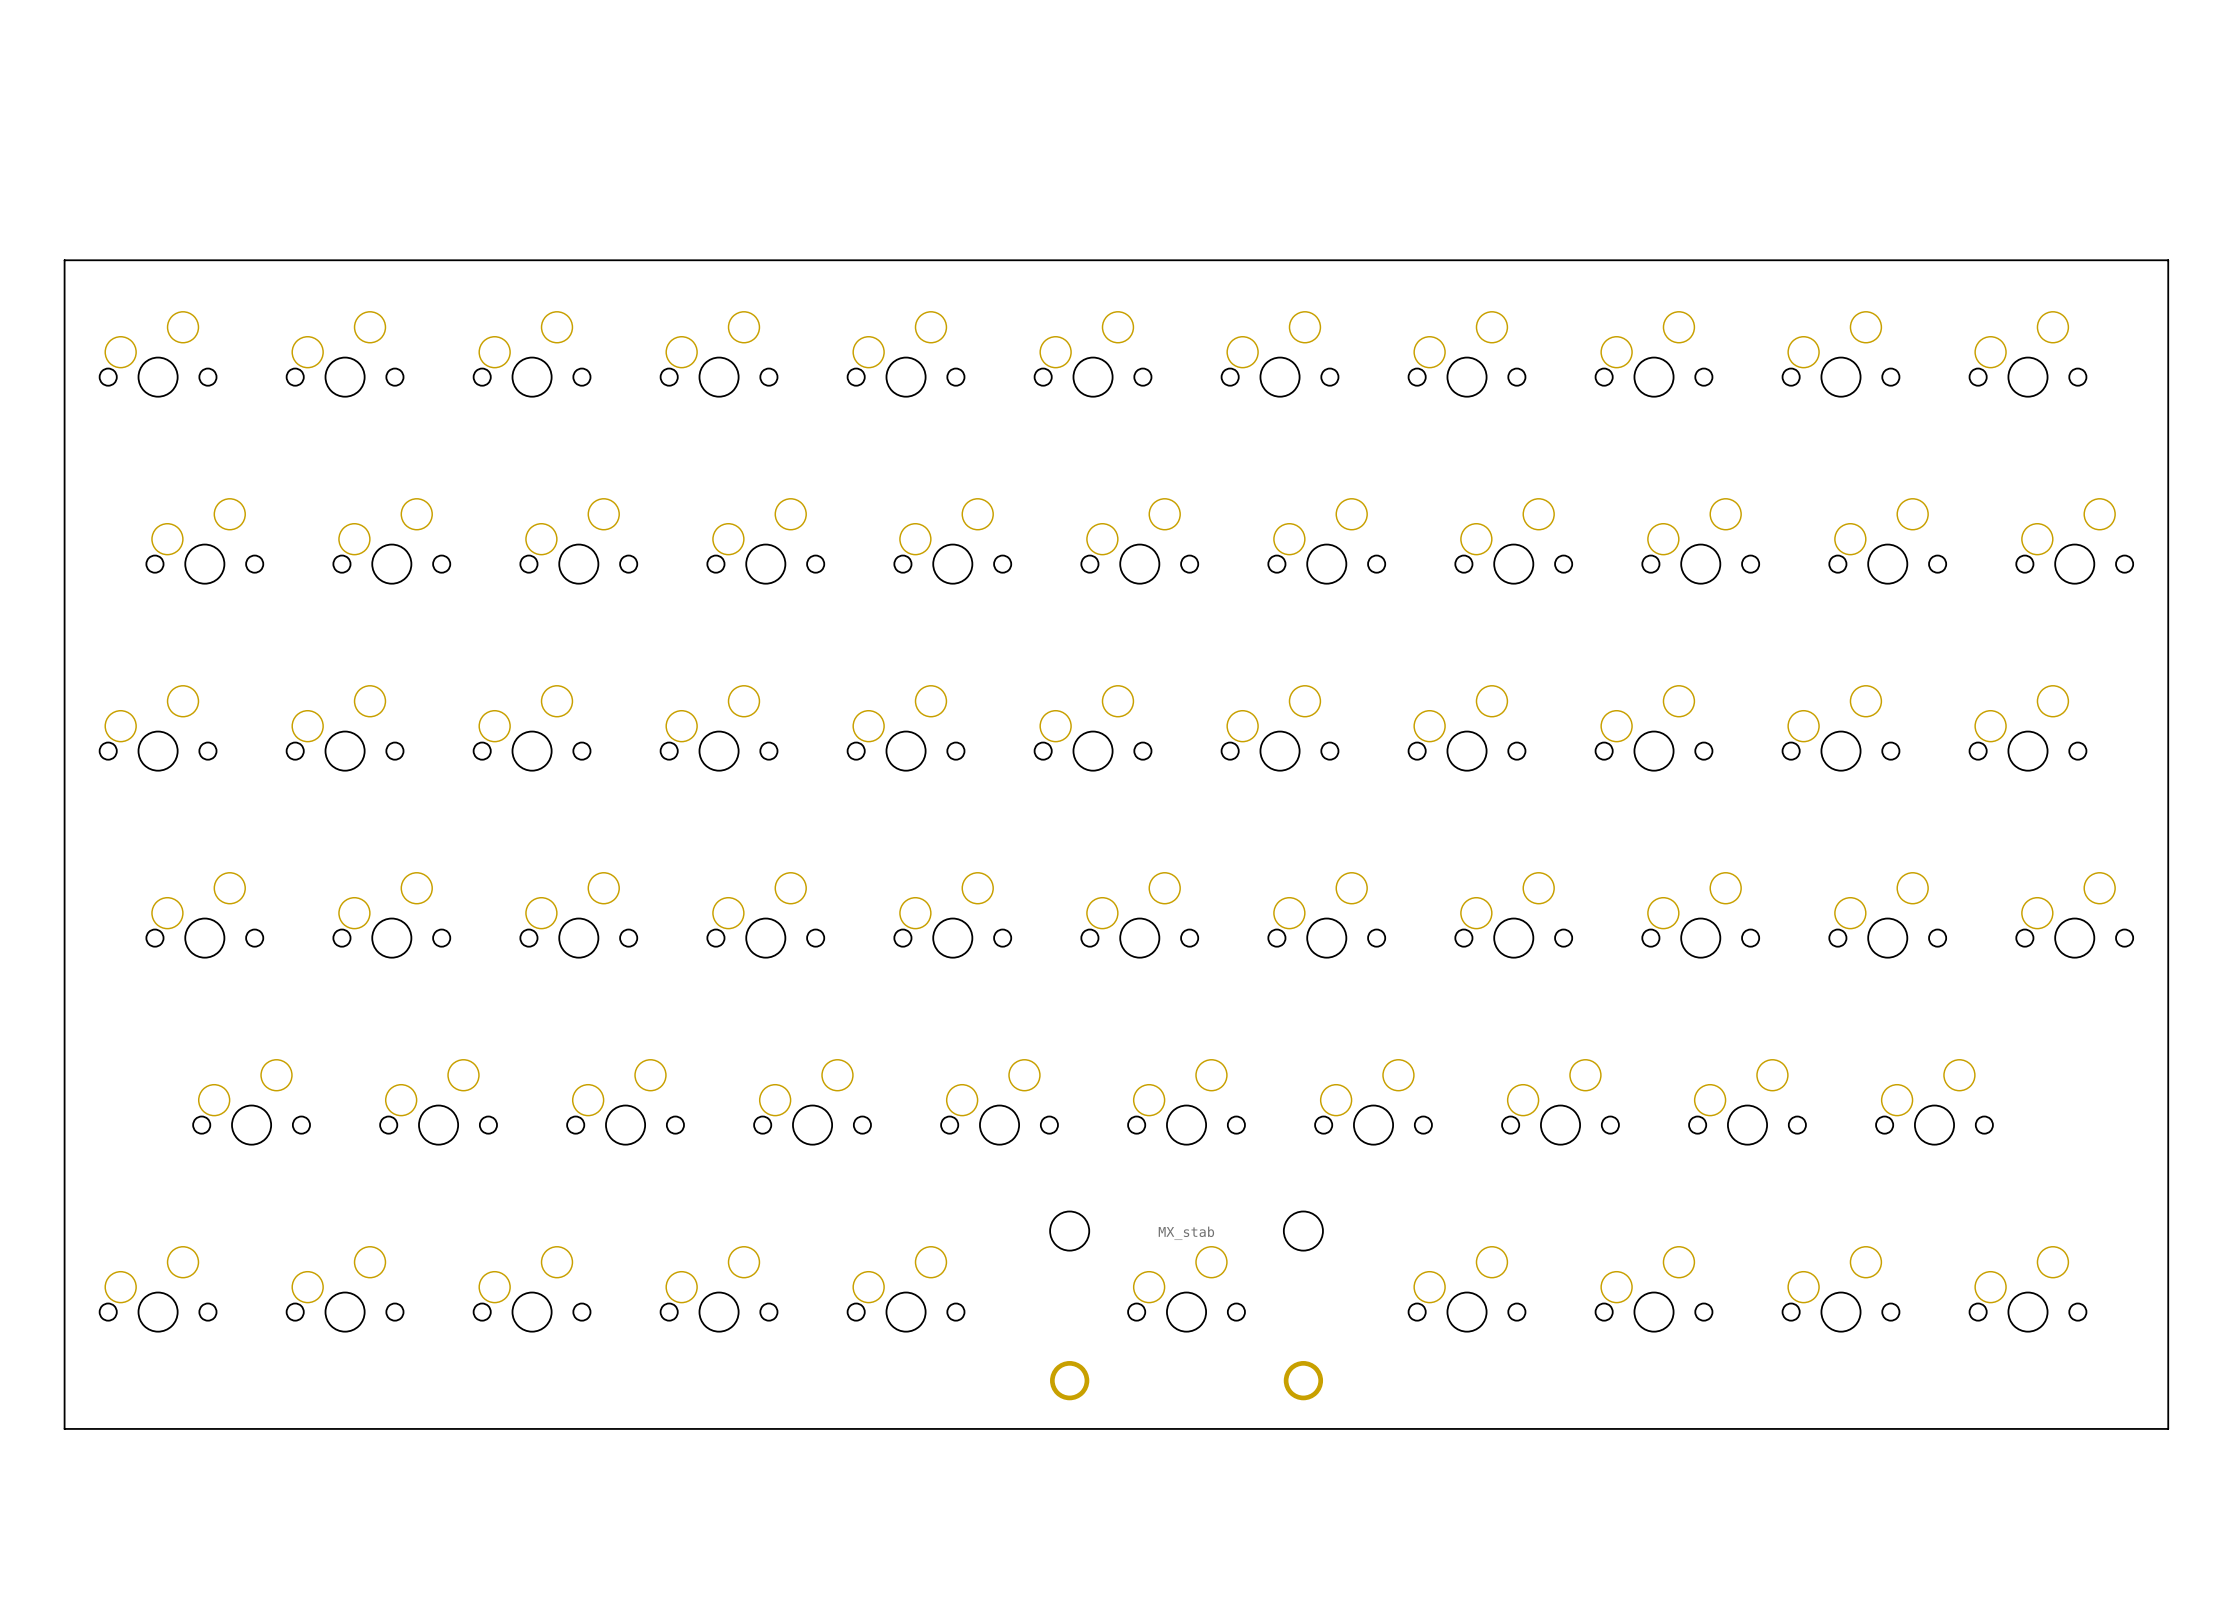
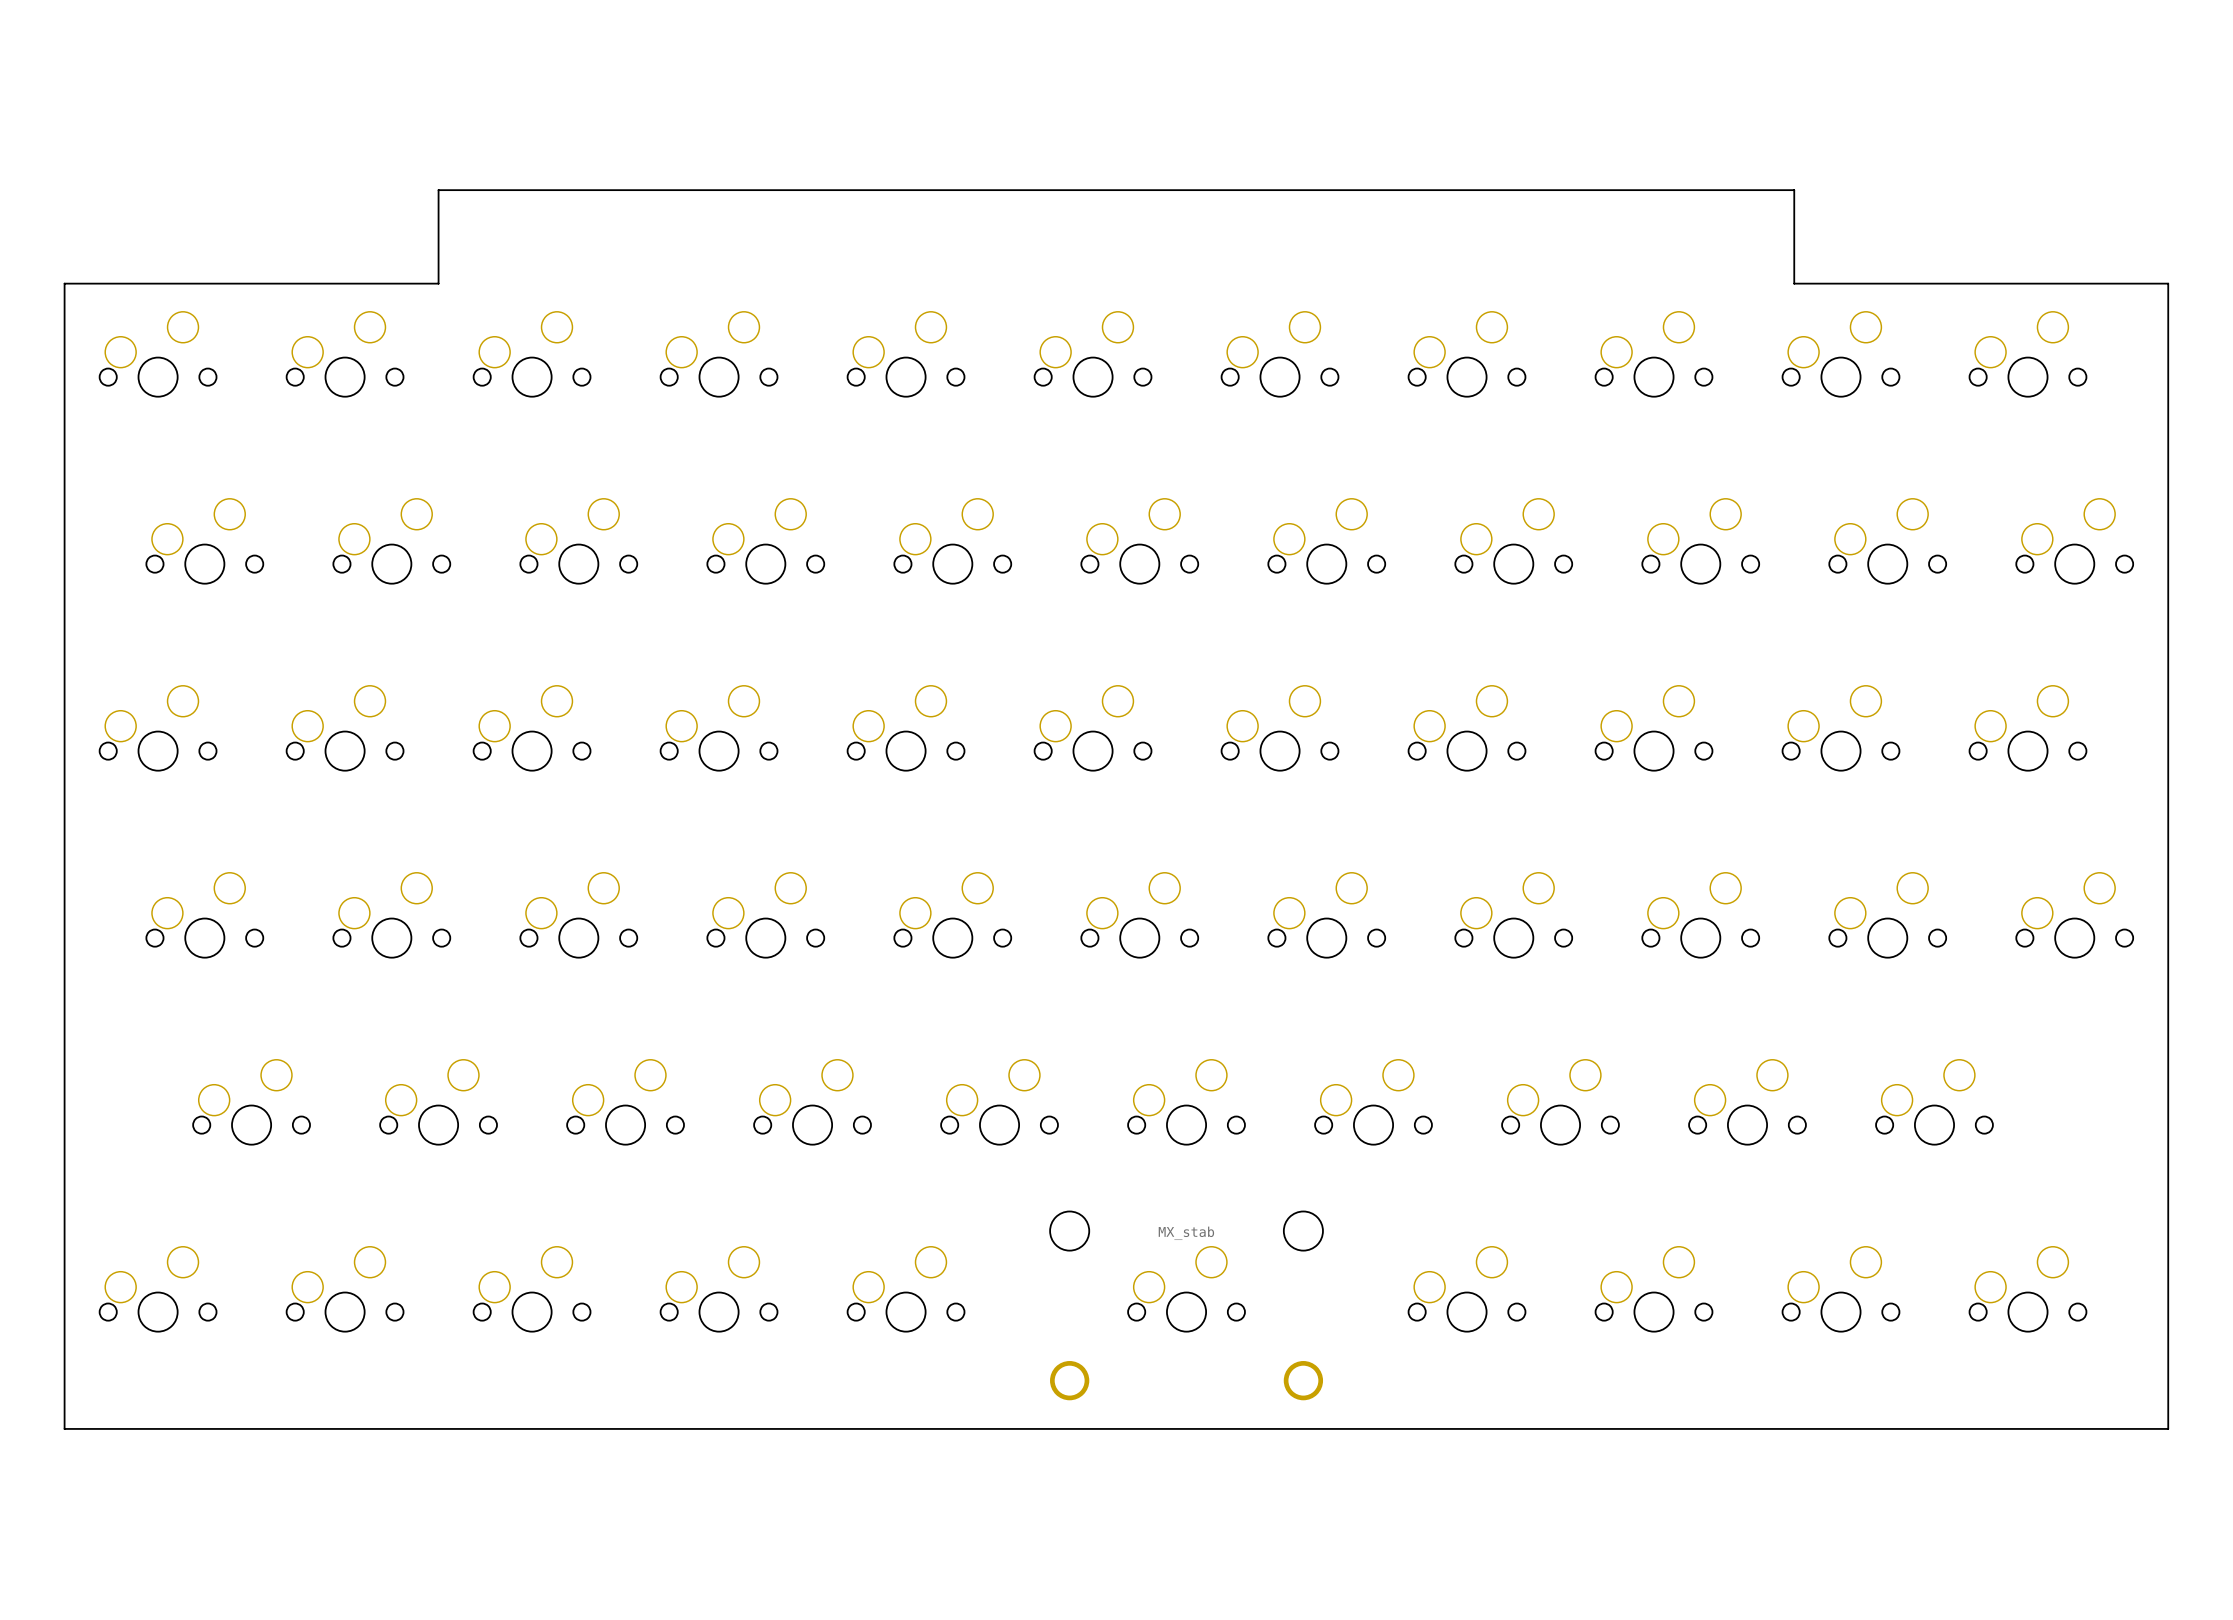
board edge: (64, 283) (64, 260) (2168, 260) (2168, 283) -> (64, 283) (438, 283) (438, 190) (1794, 190) (1794, 283) (2168, 283)

